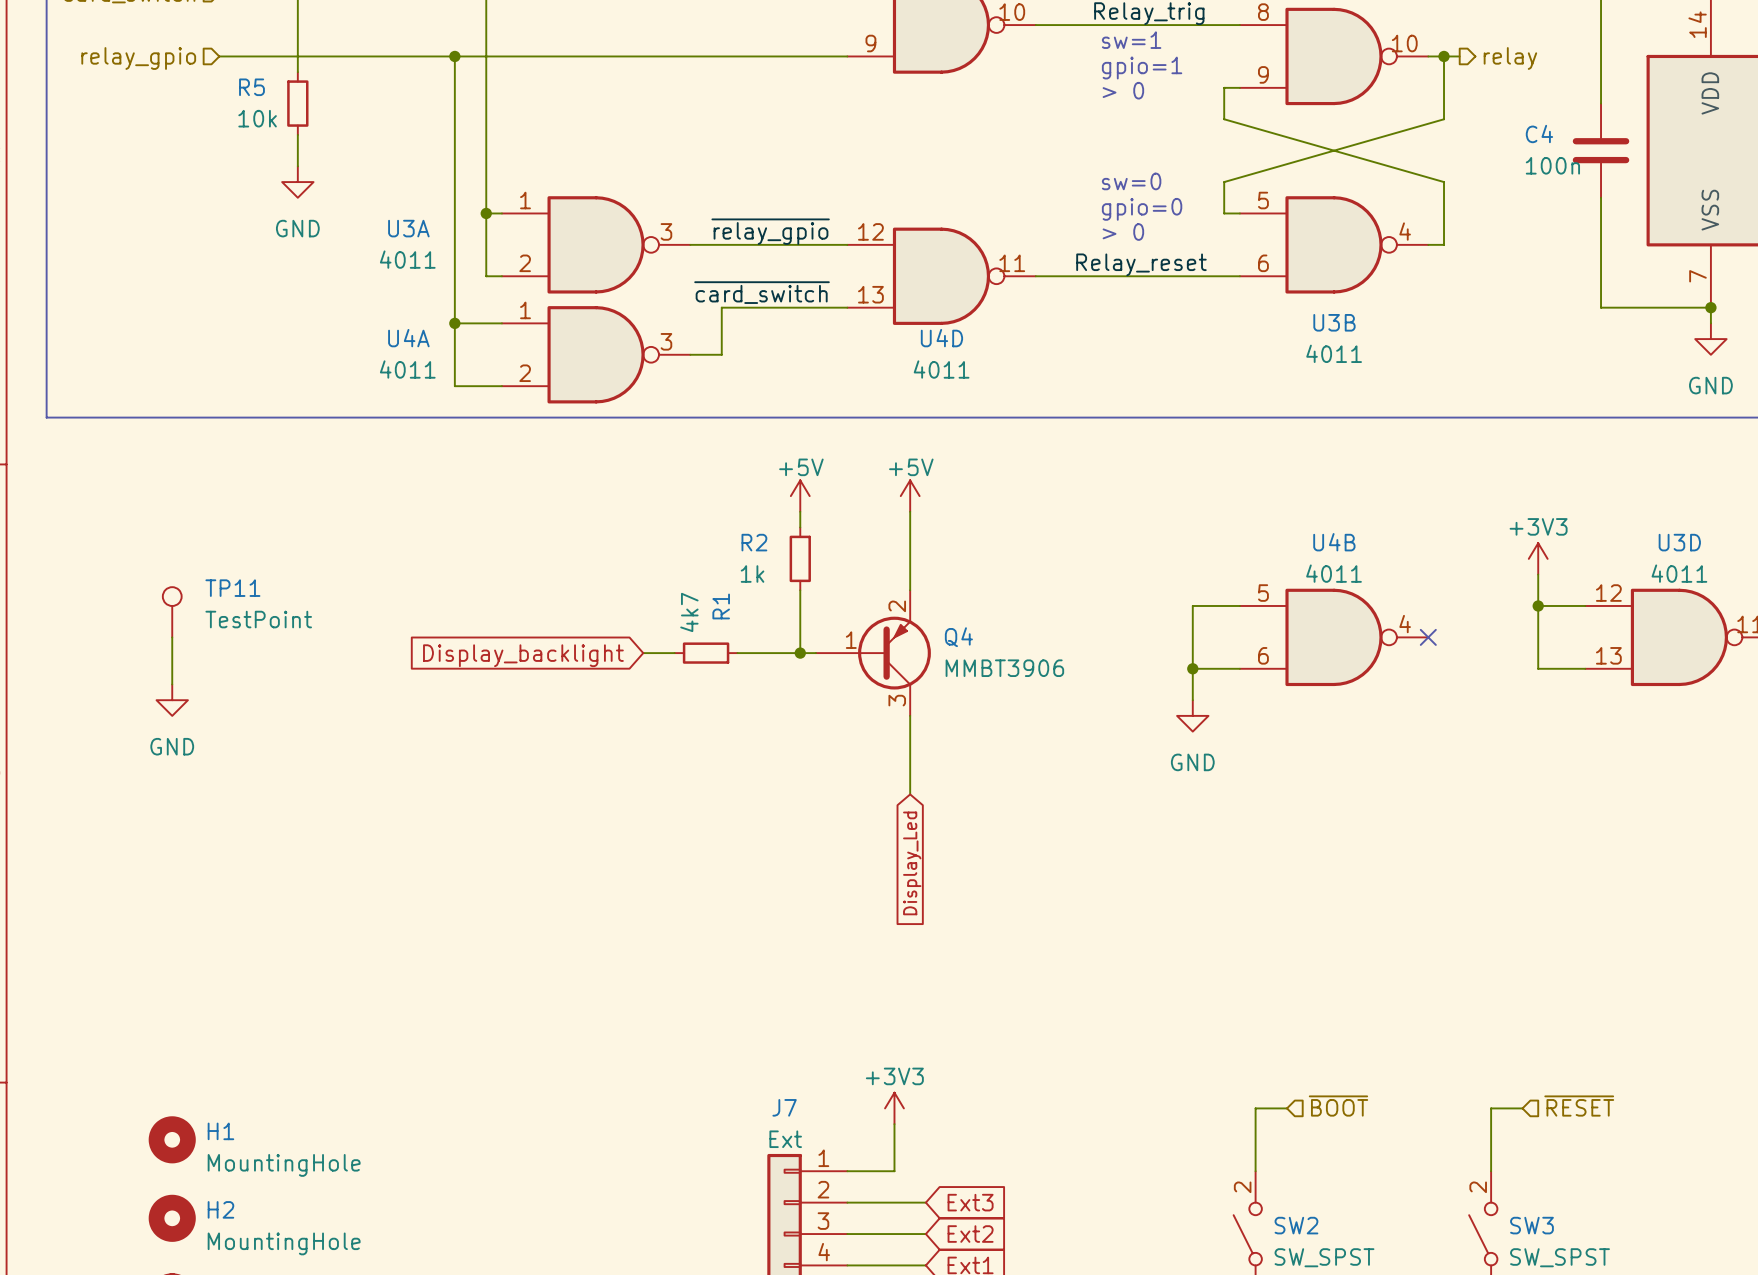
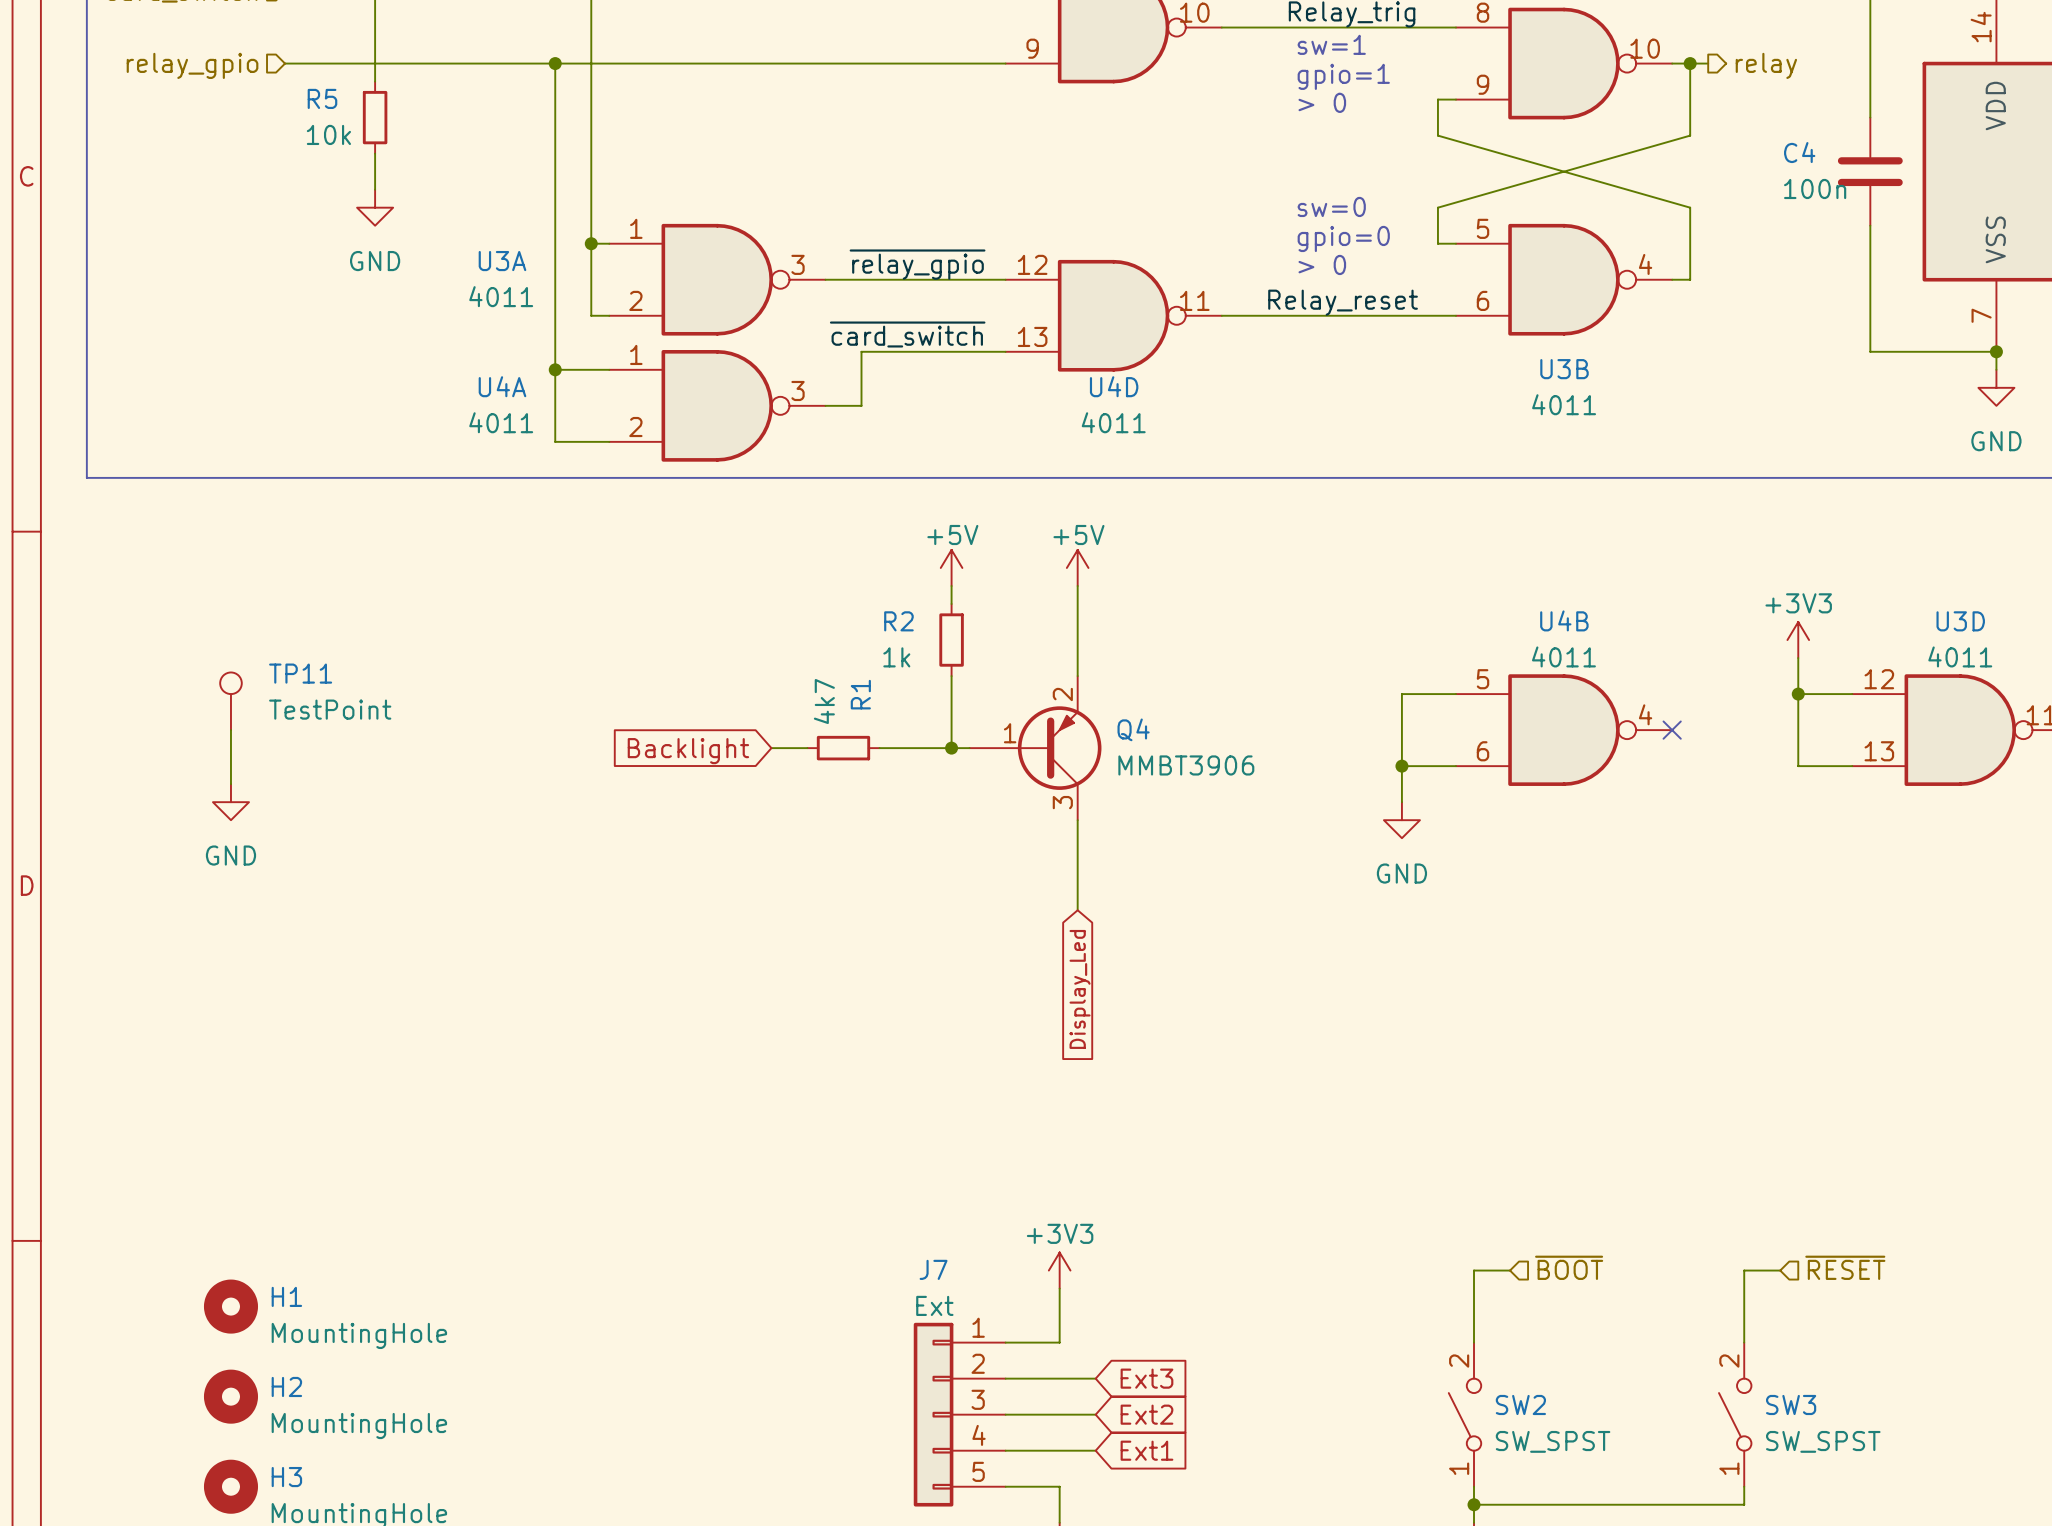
global label: Display_backlight (523, 655) -> Backlight (688, 751)

